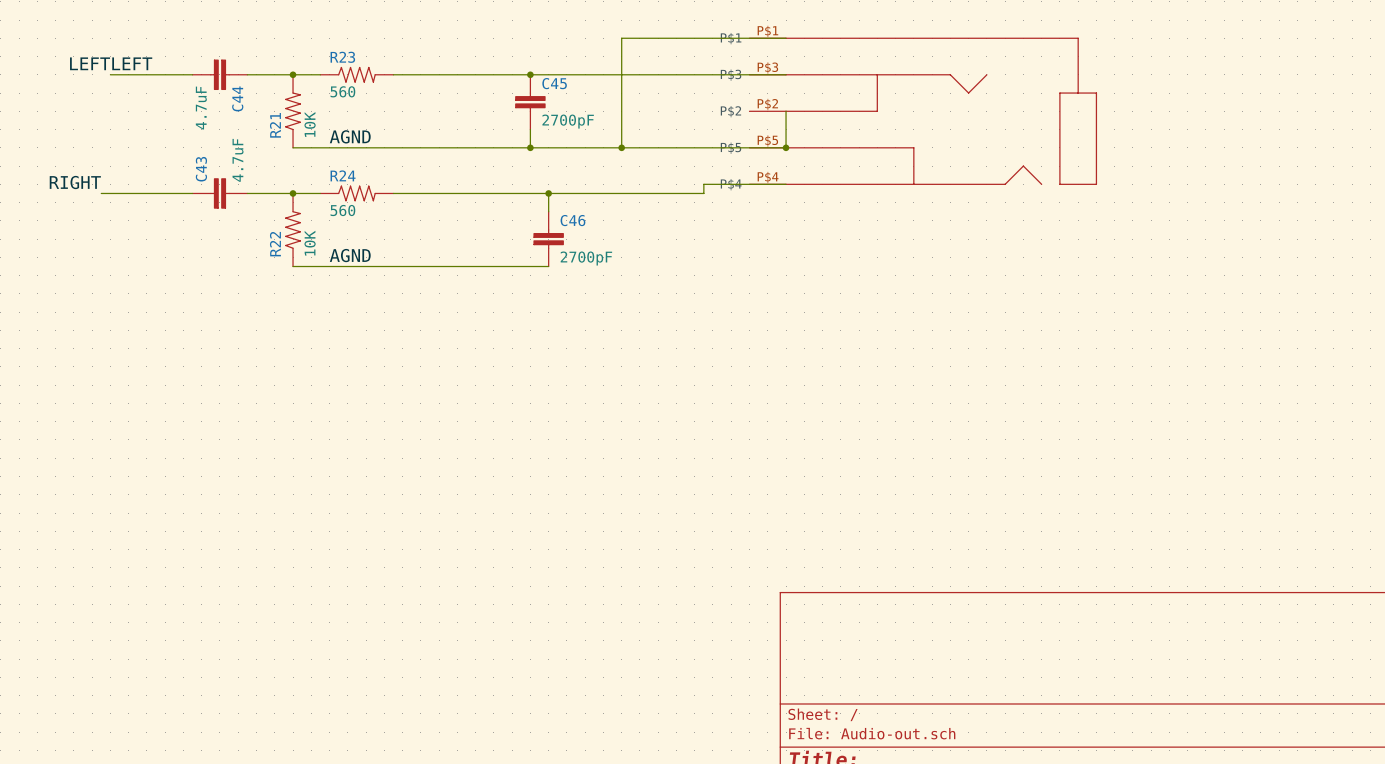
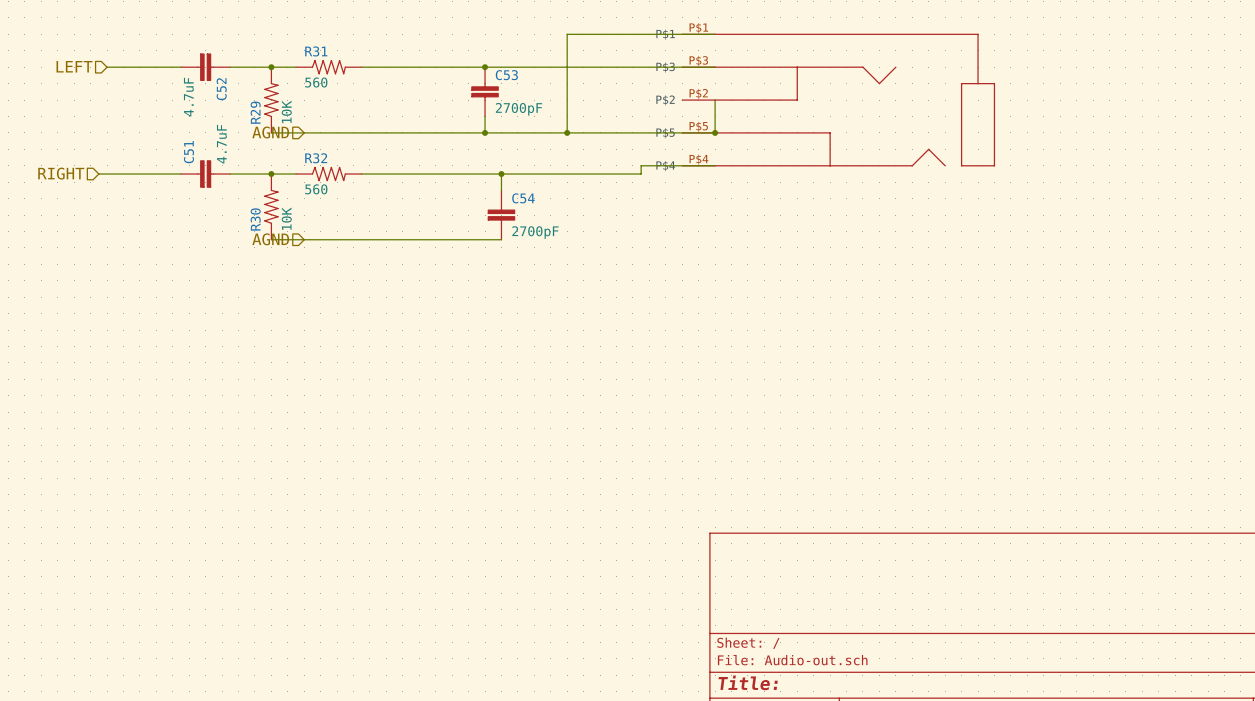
R23 name: R23 (342, 57) -> R31 (316, 51)
label: LEFT (90, 63) -> none
label: LEFT (132, 63) -> none
hierarchical label: none -> LEFT (74, 66)
C45 name: C45 (554, 83) -> C53 (506, 75)
C44 name: C44 (237, 98) -> C52 (221, 89)
R21 name: R21 (275, 125) -> R29 (255, 112)
label: AGND (350, 136) -> none
hierarchical label: none -> AGND (270, 132)
C43 name: C43 (201, 169) -> C51 (188, 152)
R24 name: R24 (343, 175) -> R32 (316, 158)
label: RIGHT (75, 182) -> none
hierarchical label: none -> RIGHT (61, 173)
C46 name: C46 (572, 220) -> C54 (523, 198)
R22 name: R22 (275, 244) -> R30 (255, 219)
label: AGND (350, 255) -> none
hierarchical label: none -> AGND (270, 239)

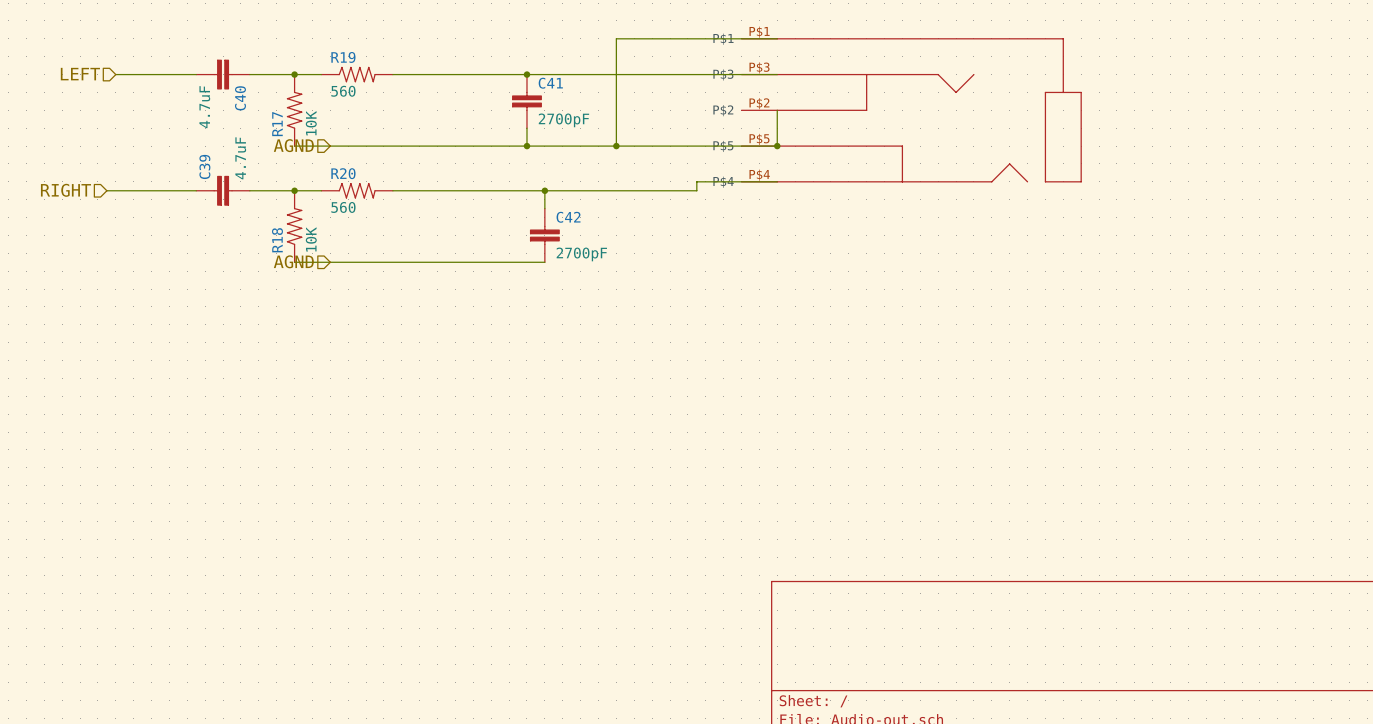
R31 name: R31 (316, 51) -> R19 (343, 57)
C53 name: C53 (506, 75) -> C41 (550, 83)
C52 name: C52 (221, 89) -> C40 (240, 98)
R29 name: R29 (255, 112) -> R17 (277, 124)
C51 name: C51 (188, 152) -> C39 (204, 166)
R32 name: R32 (316, 158) -> R20 (343, 173)
C54 name: C54 (523, 198) -> C42 (568, 217)
R30 name: R30 (255, 219) -> R18 (277, 240)

